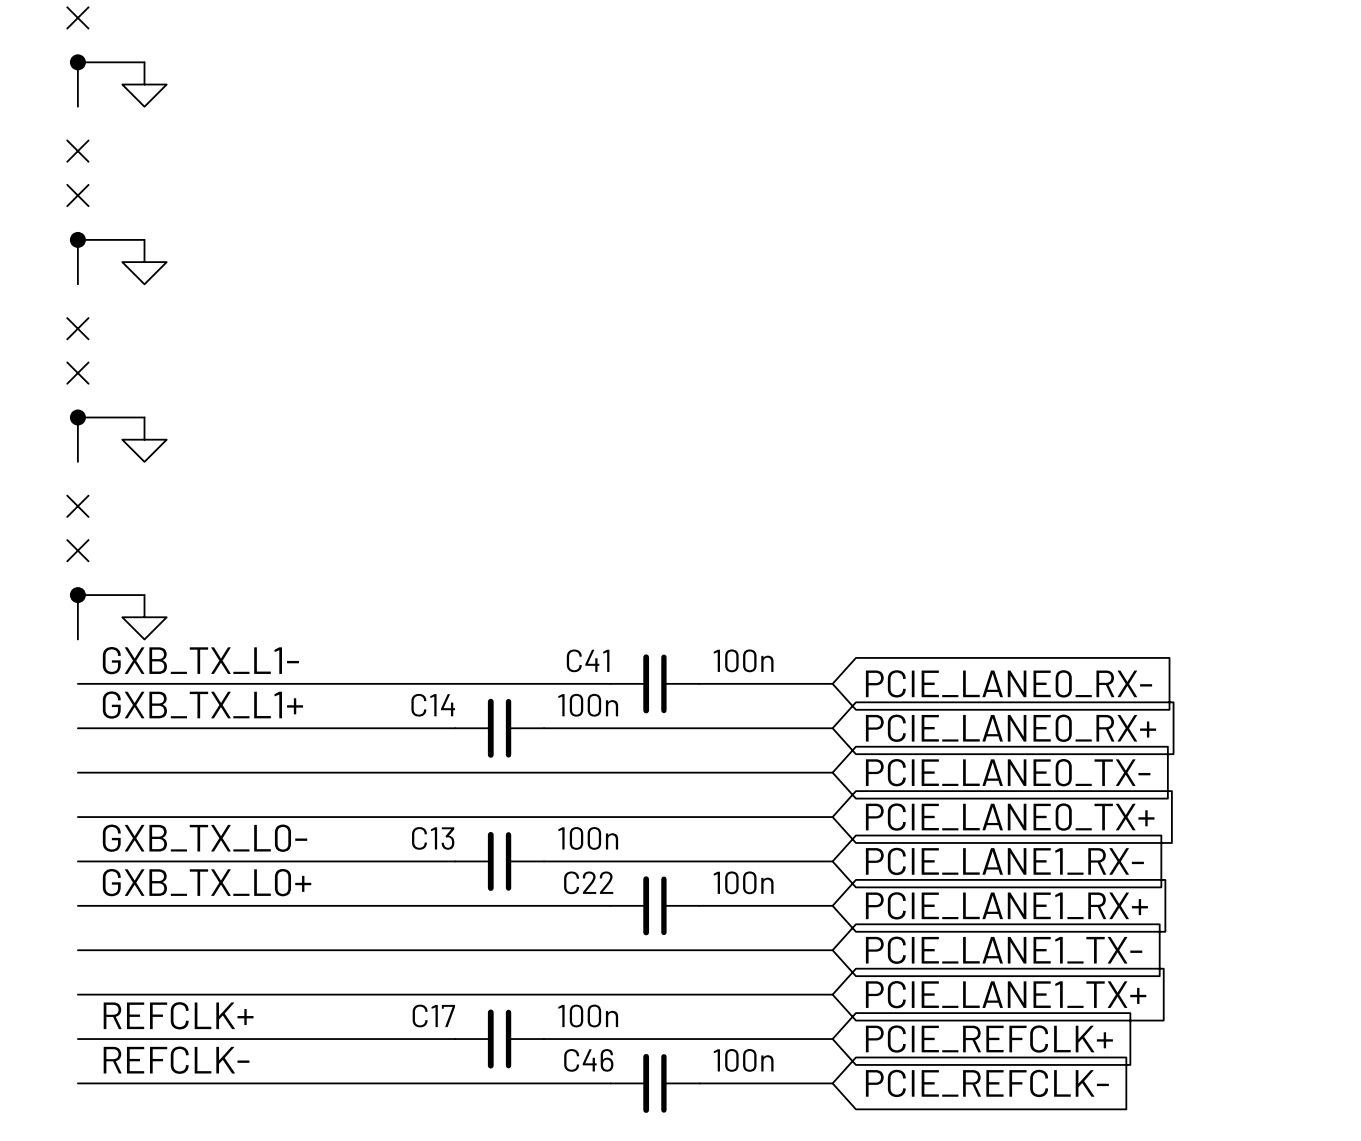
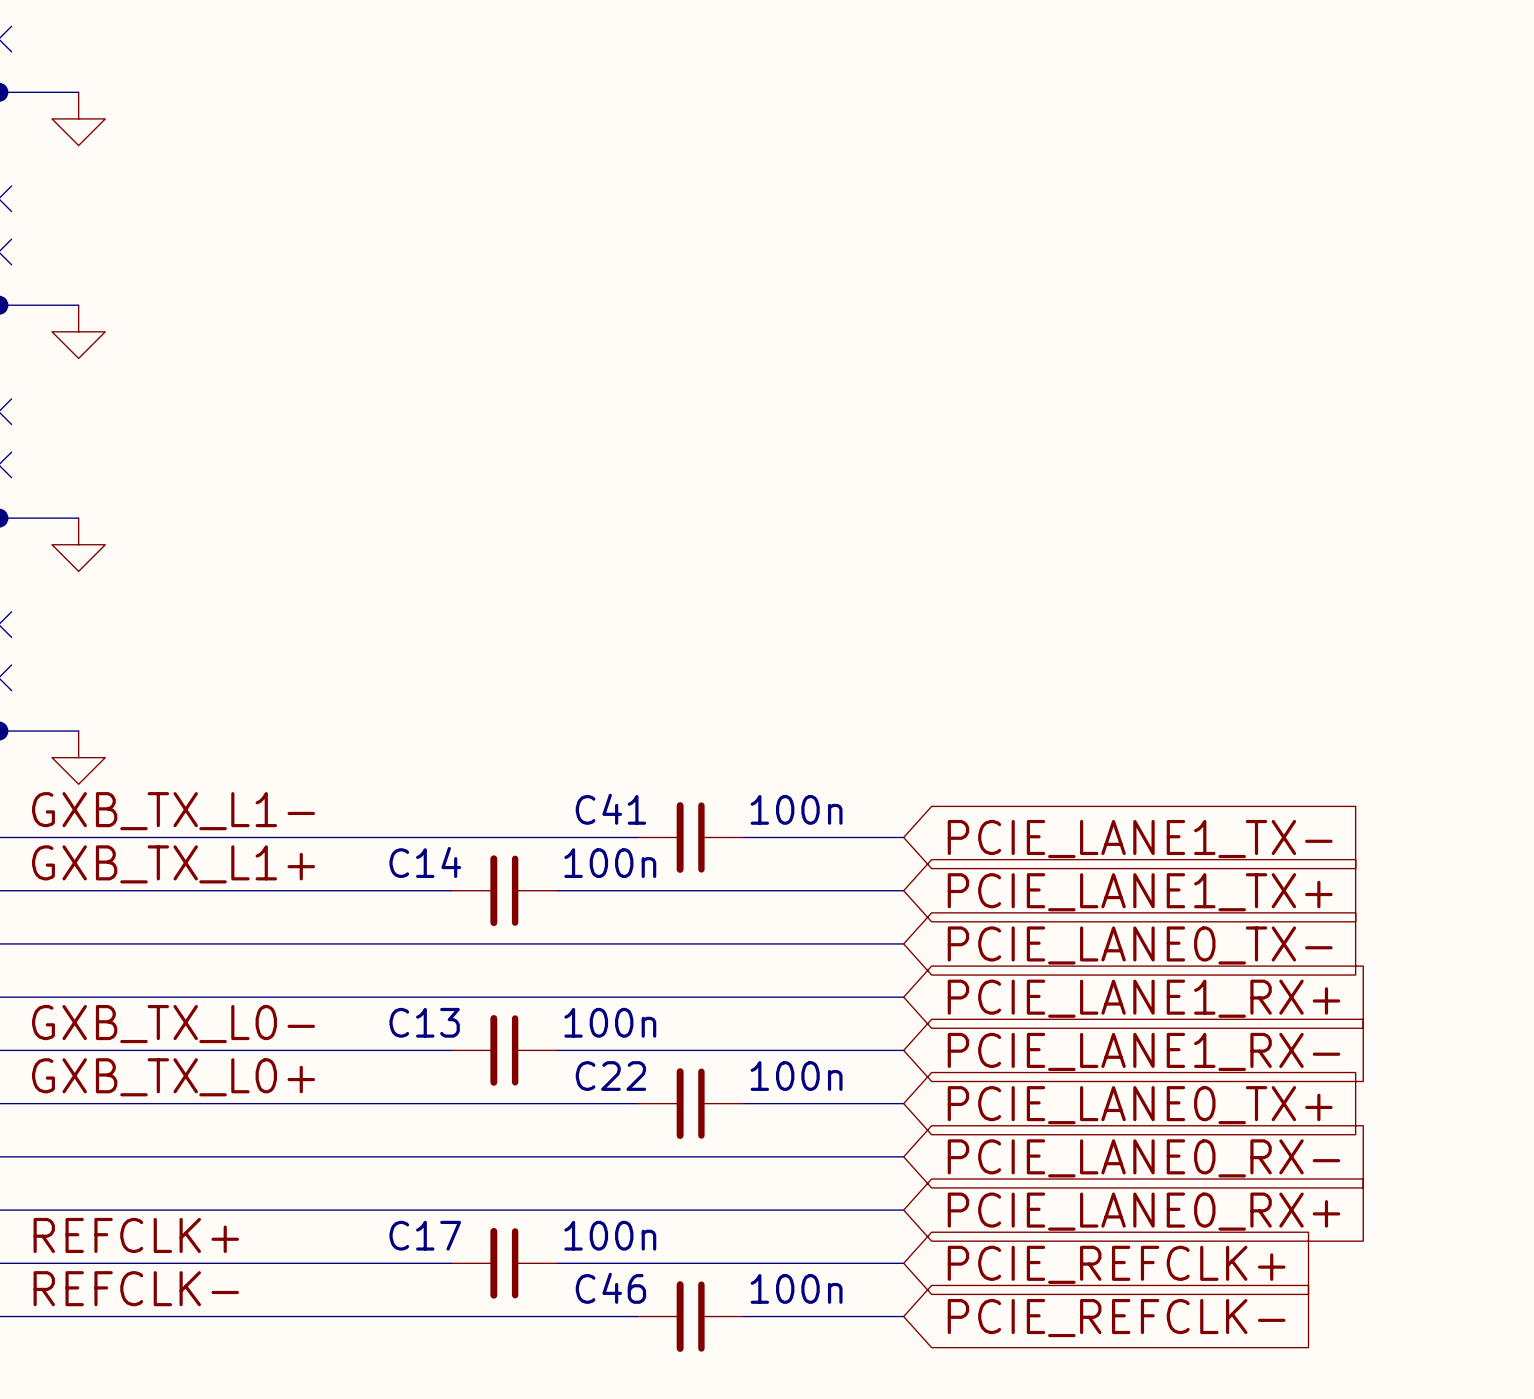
global label: PCIE_LANE0_RX- (1009, 683) -> PCIE_LANE1_TX- (1140, 839)
global label: PCIE_LANE0_RX+ (1011, 728) -> PCIE_LANE1_TX+ (1140, 892)
global label: PCIE_LANE0_TX+ (1010, 817) -> PCIE_LANE1_RX+ (1143, 998)
global label: PCIE_LANE1_RX+ (1006, 905) -> PCIE_LANE0_TX+ (1140, 1105)
global label: PCIE_LANE1_TX- (1004, 950) -> PCIE_LANE0_RX- (1143, 1158)
global label: PCIE_LANE1_TX+ (1006, 994) -> PCIE_LANE0_RX+ (1143, 1211)

